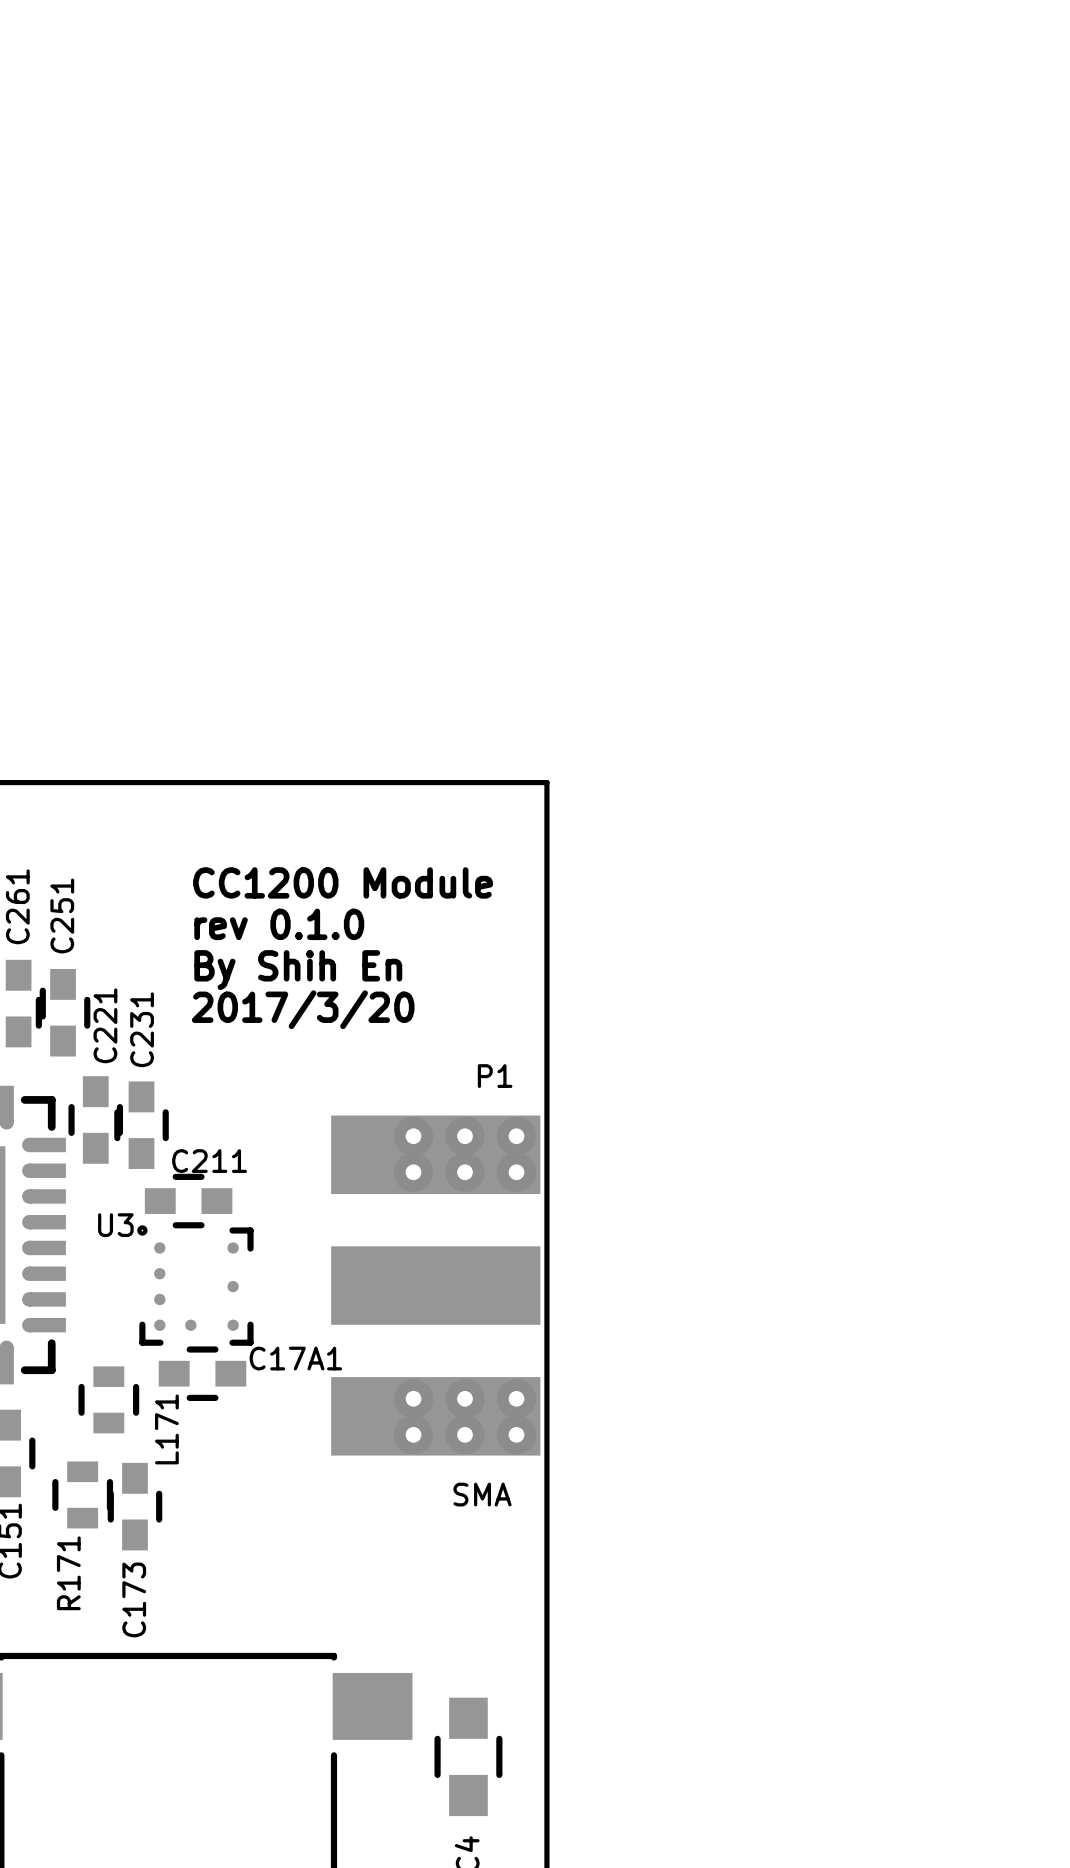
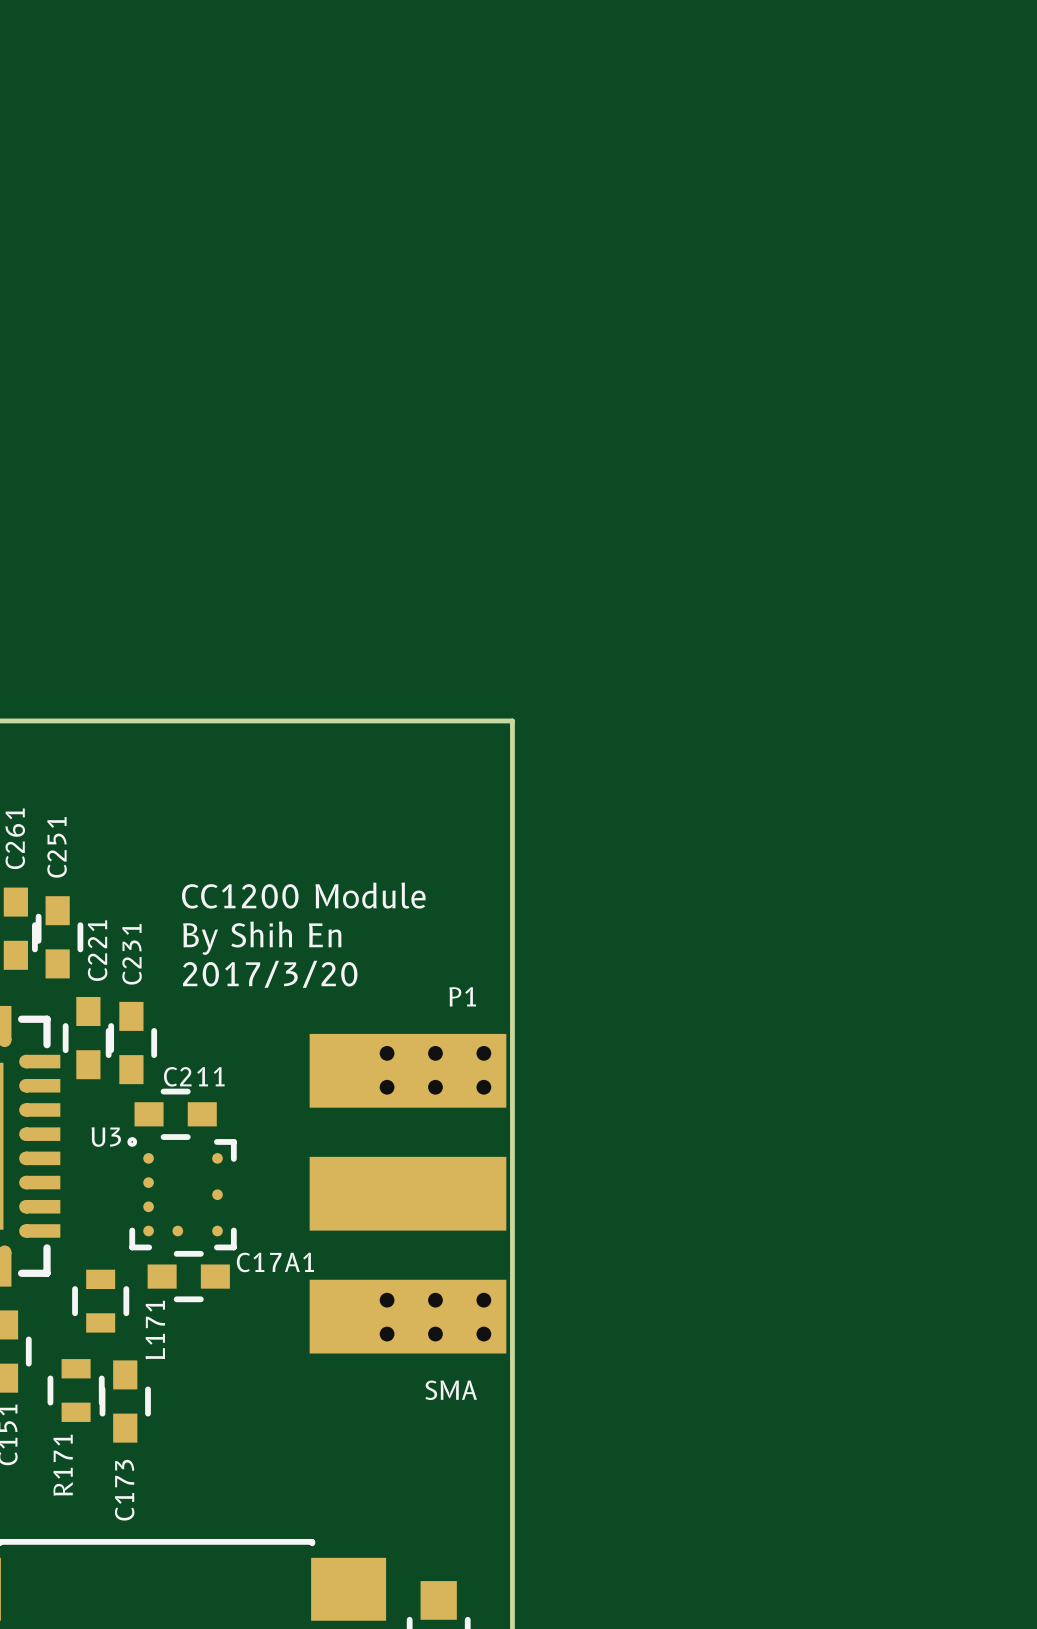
text position: CC1200 Module (343, 882) -> CC1200 Module (303, 895)
text: rev 0.1.0 (279, 924) -> none
text position: By Shih En (298, 970) -> By Shih En (262, 938)
text position: 2017/3/20 (303, 1009) -> 2017/3/20 (270, 974)

